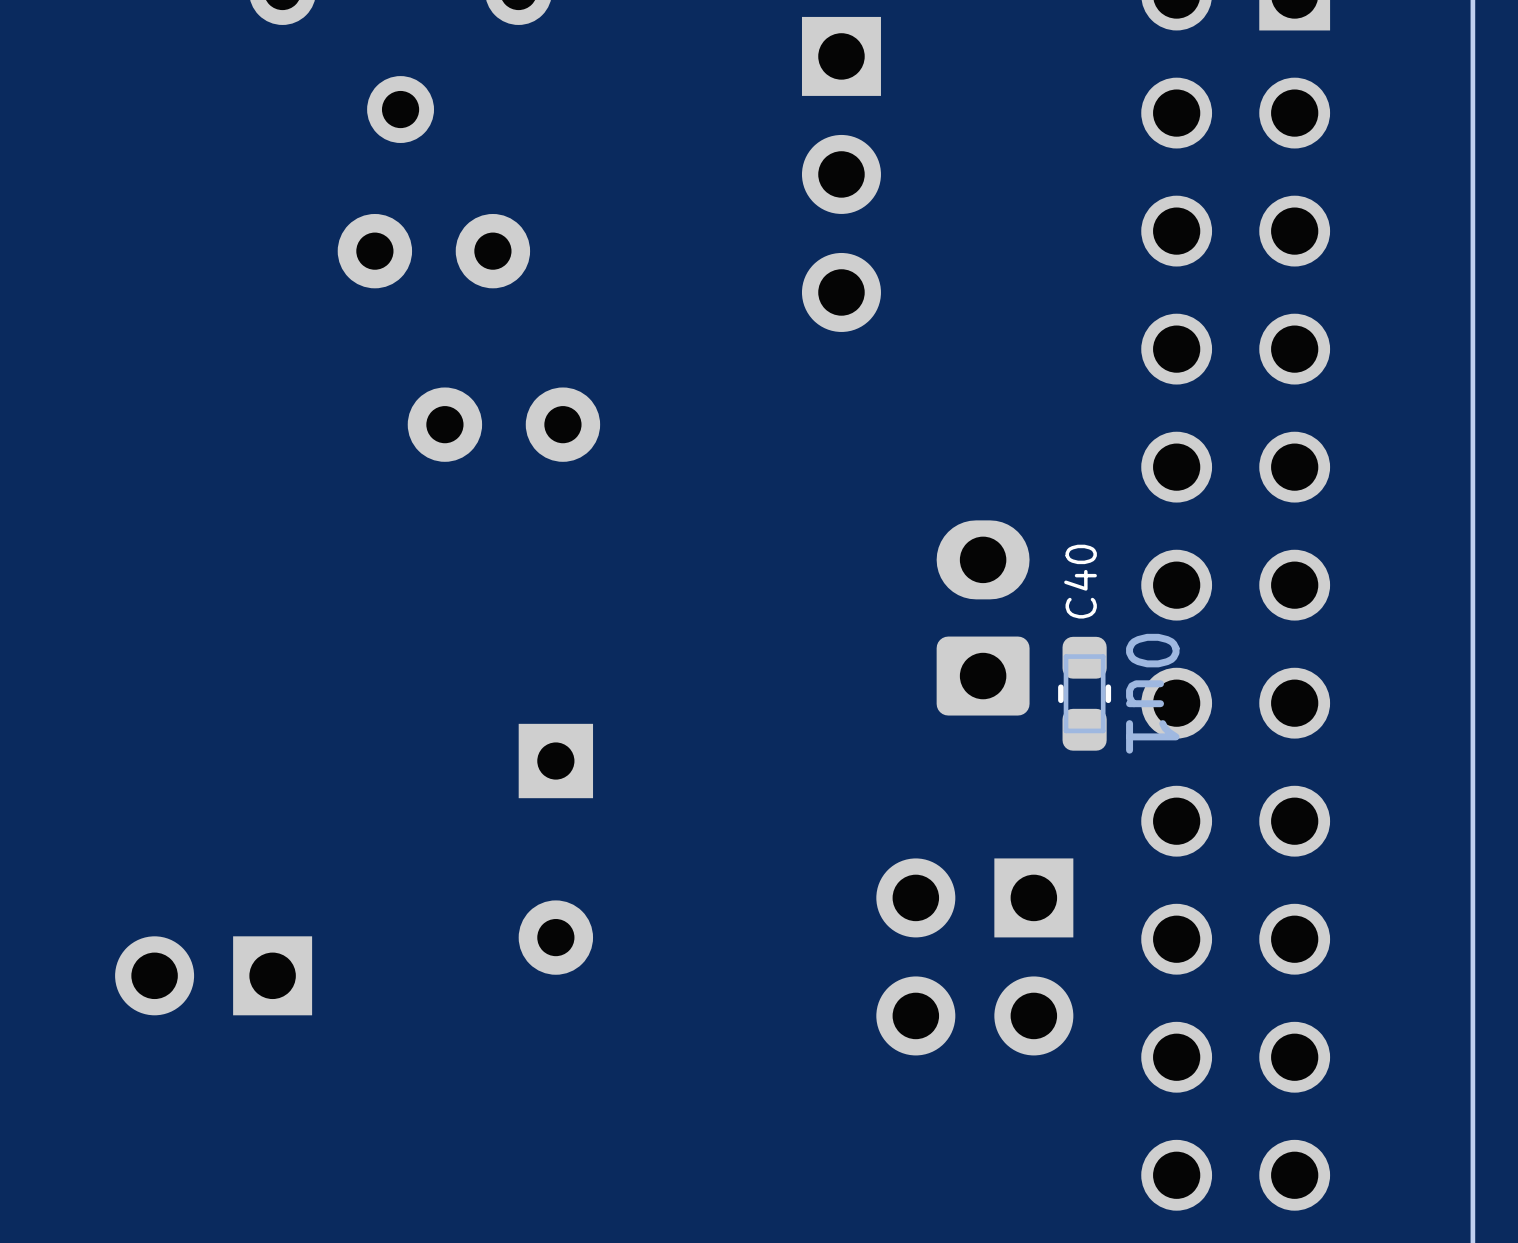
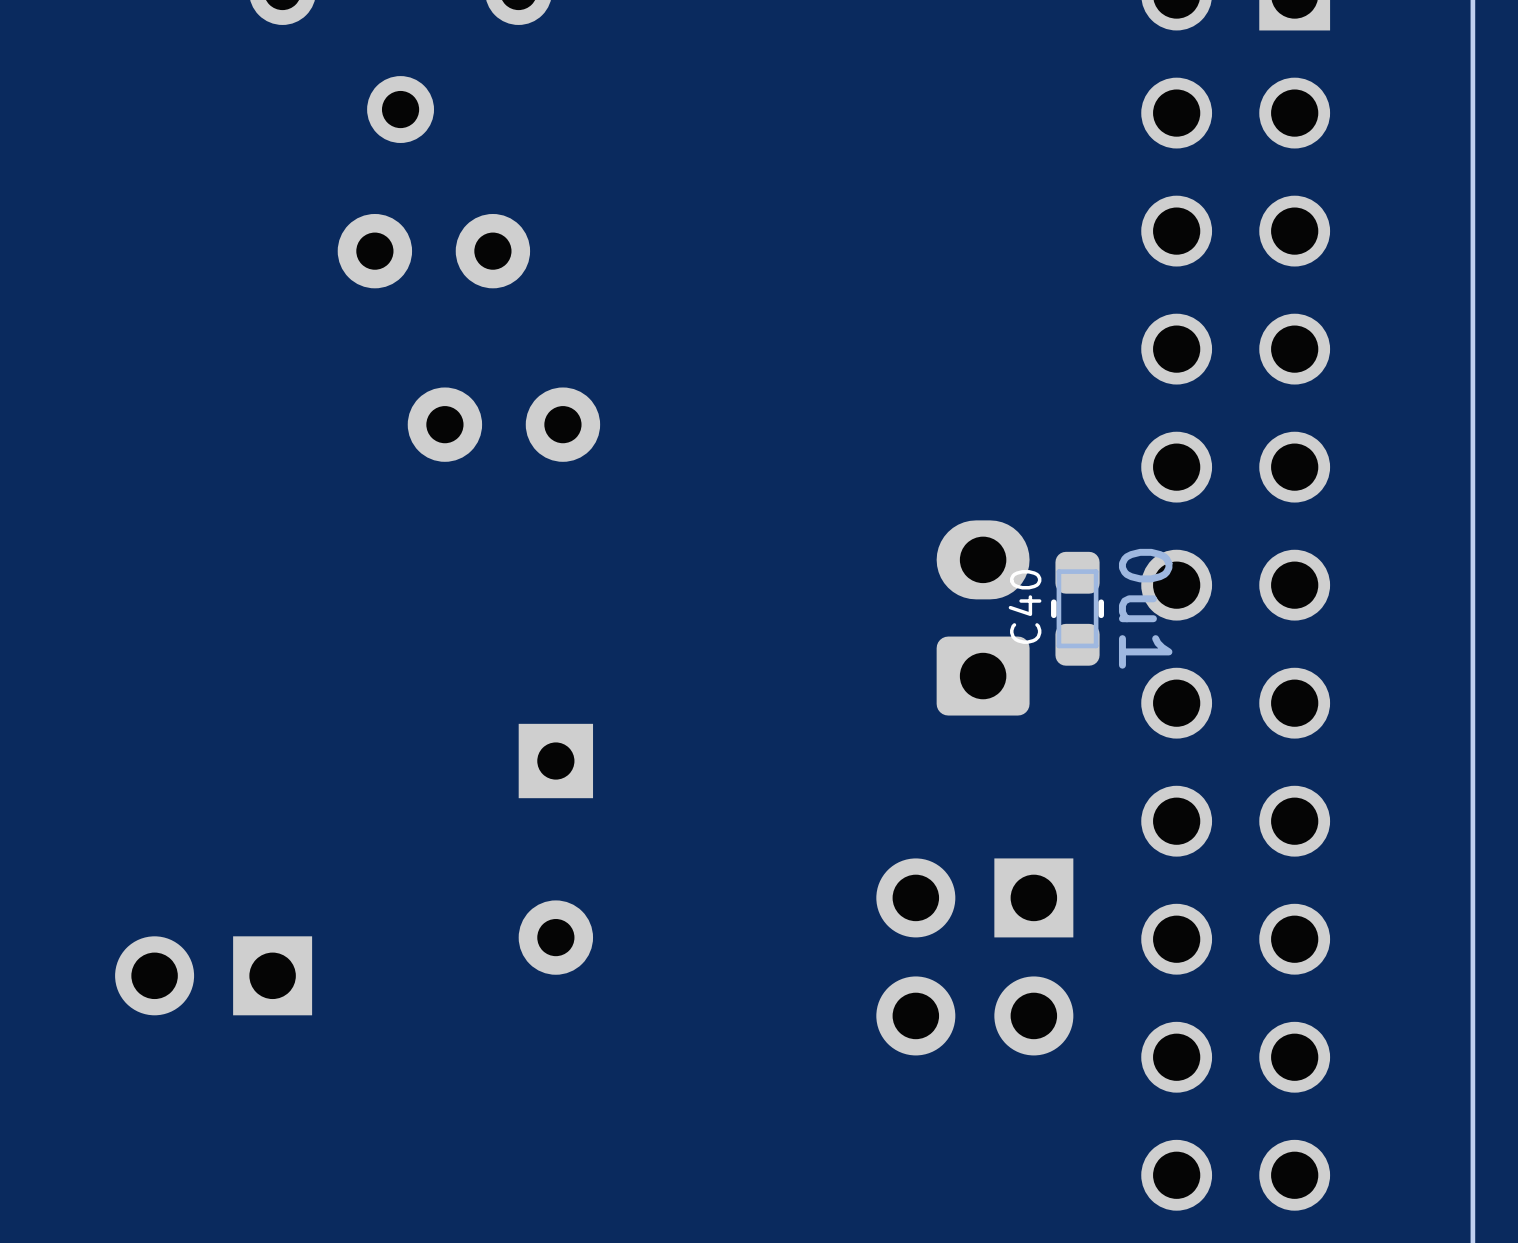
part: (841, 174) -> none
C40 name position: C40 (1080, 581) -> C40 (1025, 606)
C40 position: (1084, 693) -> (1077, 608)

